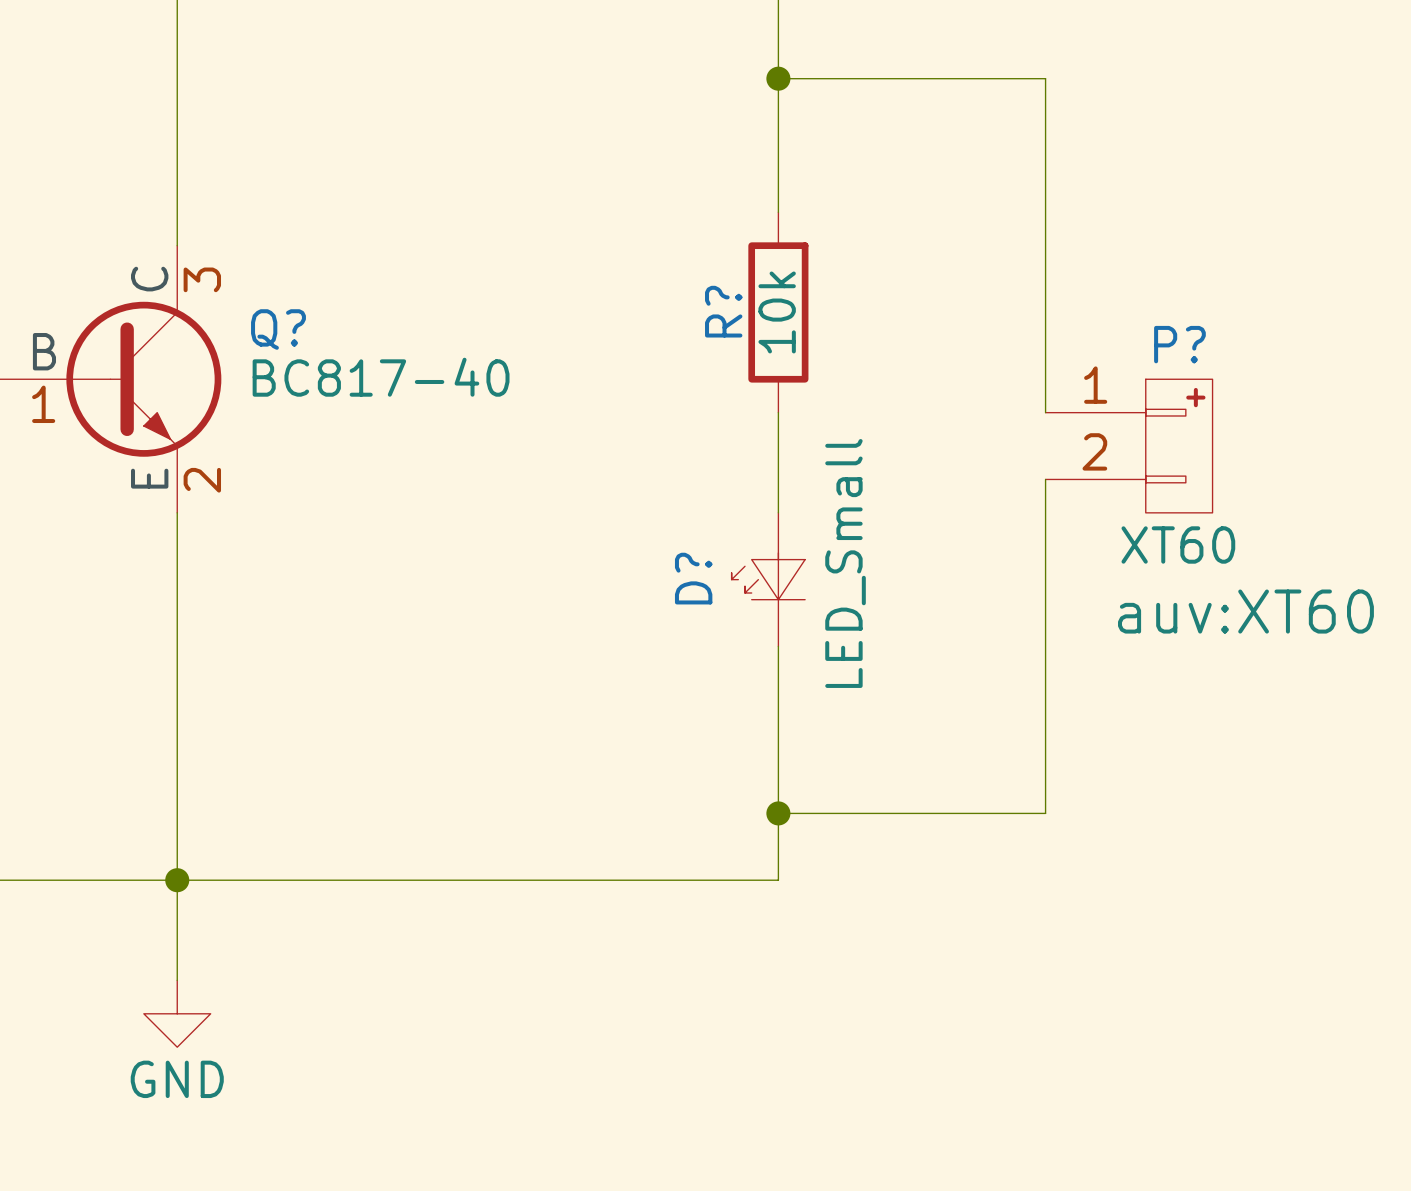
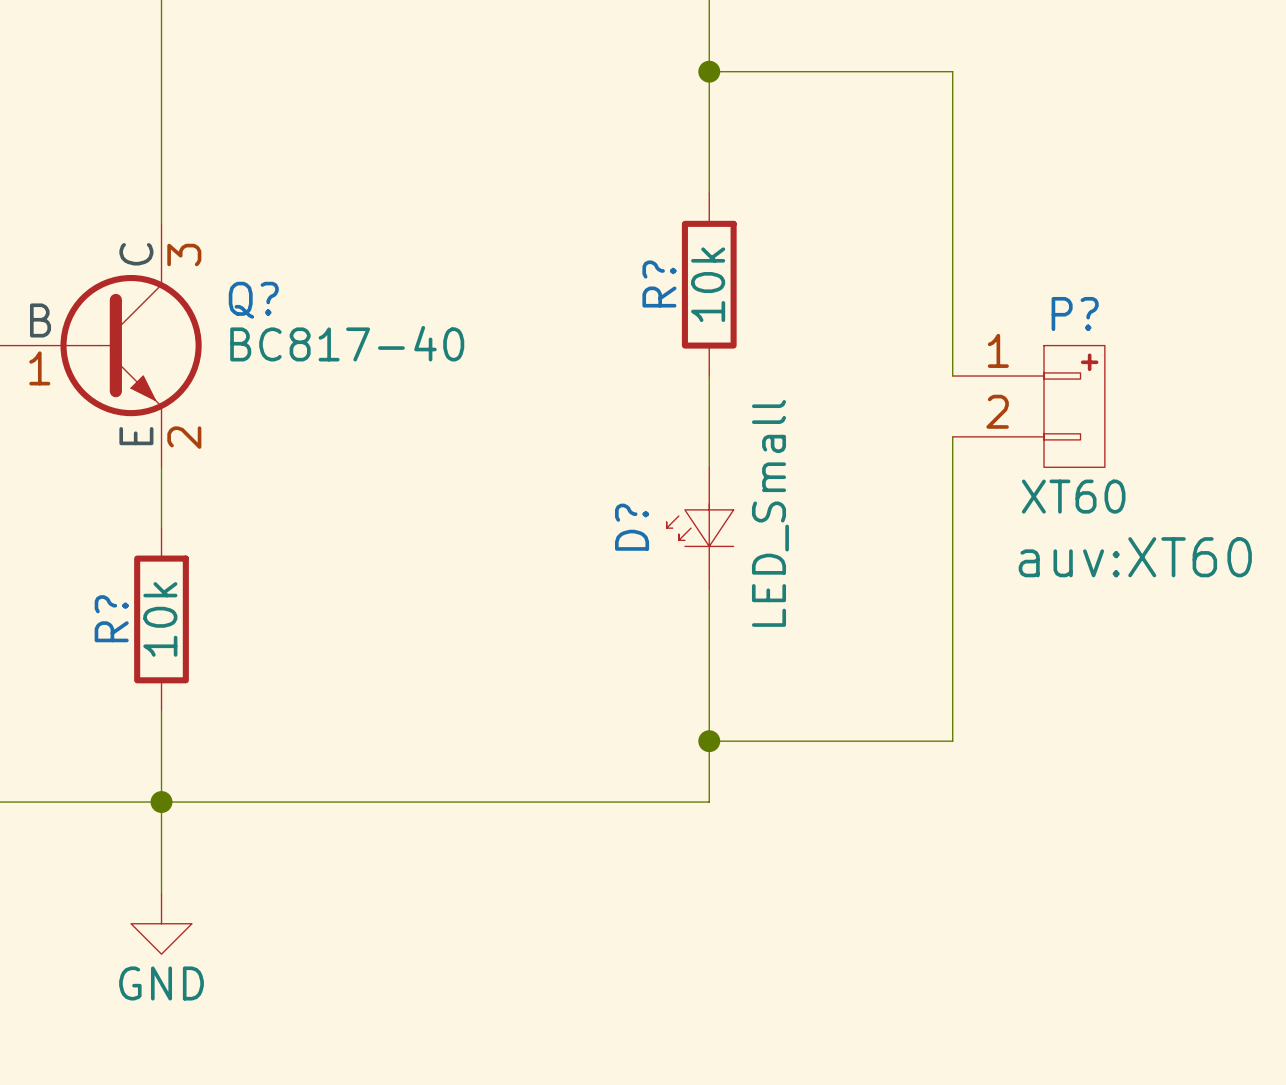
wire: (177, 579) (177, 780) -> none
R?: none -> 10k (161, 619)

